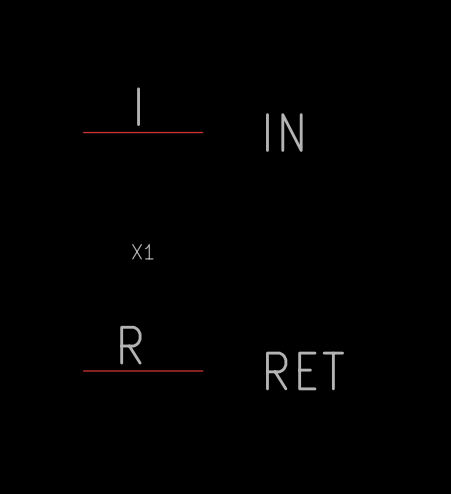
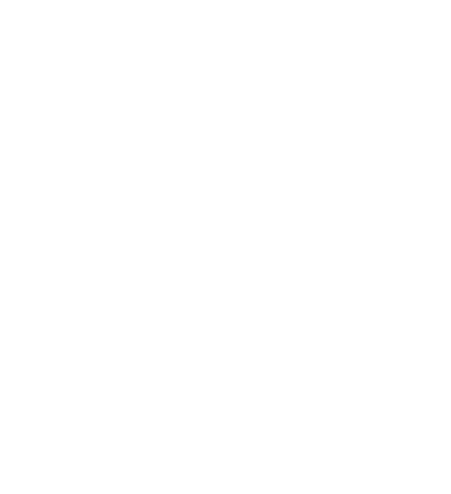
X1: (143, 251) -> none

